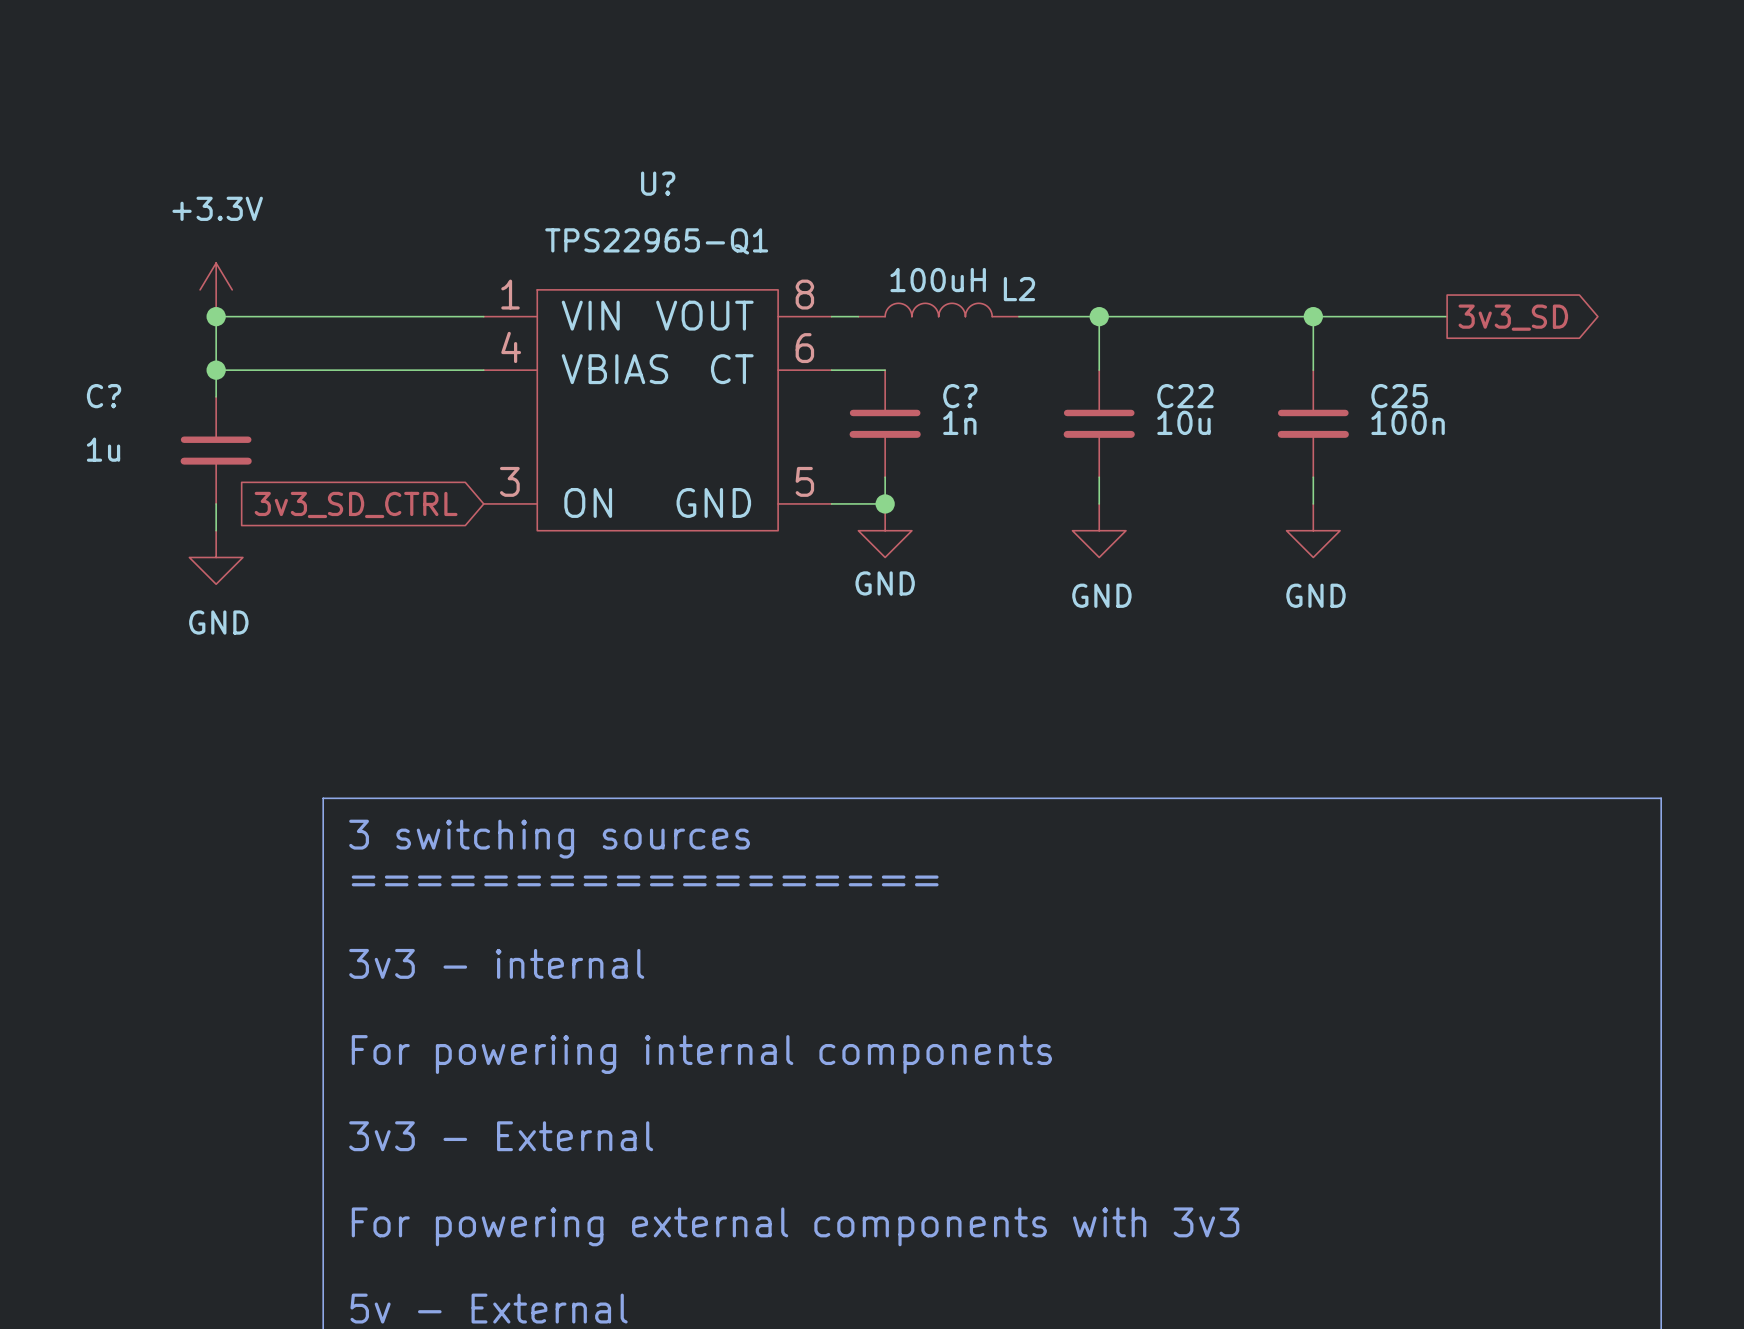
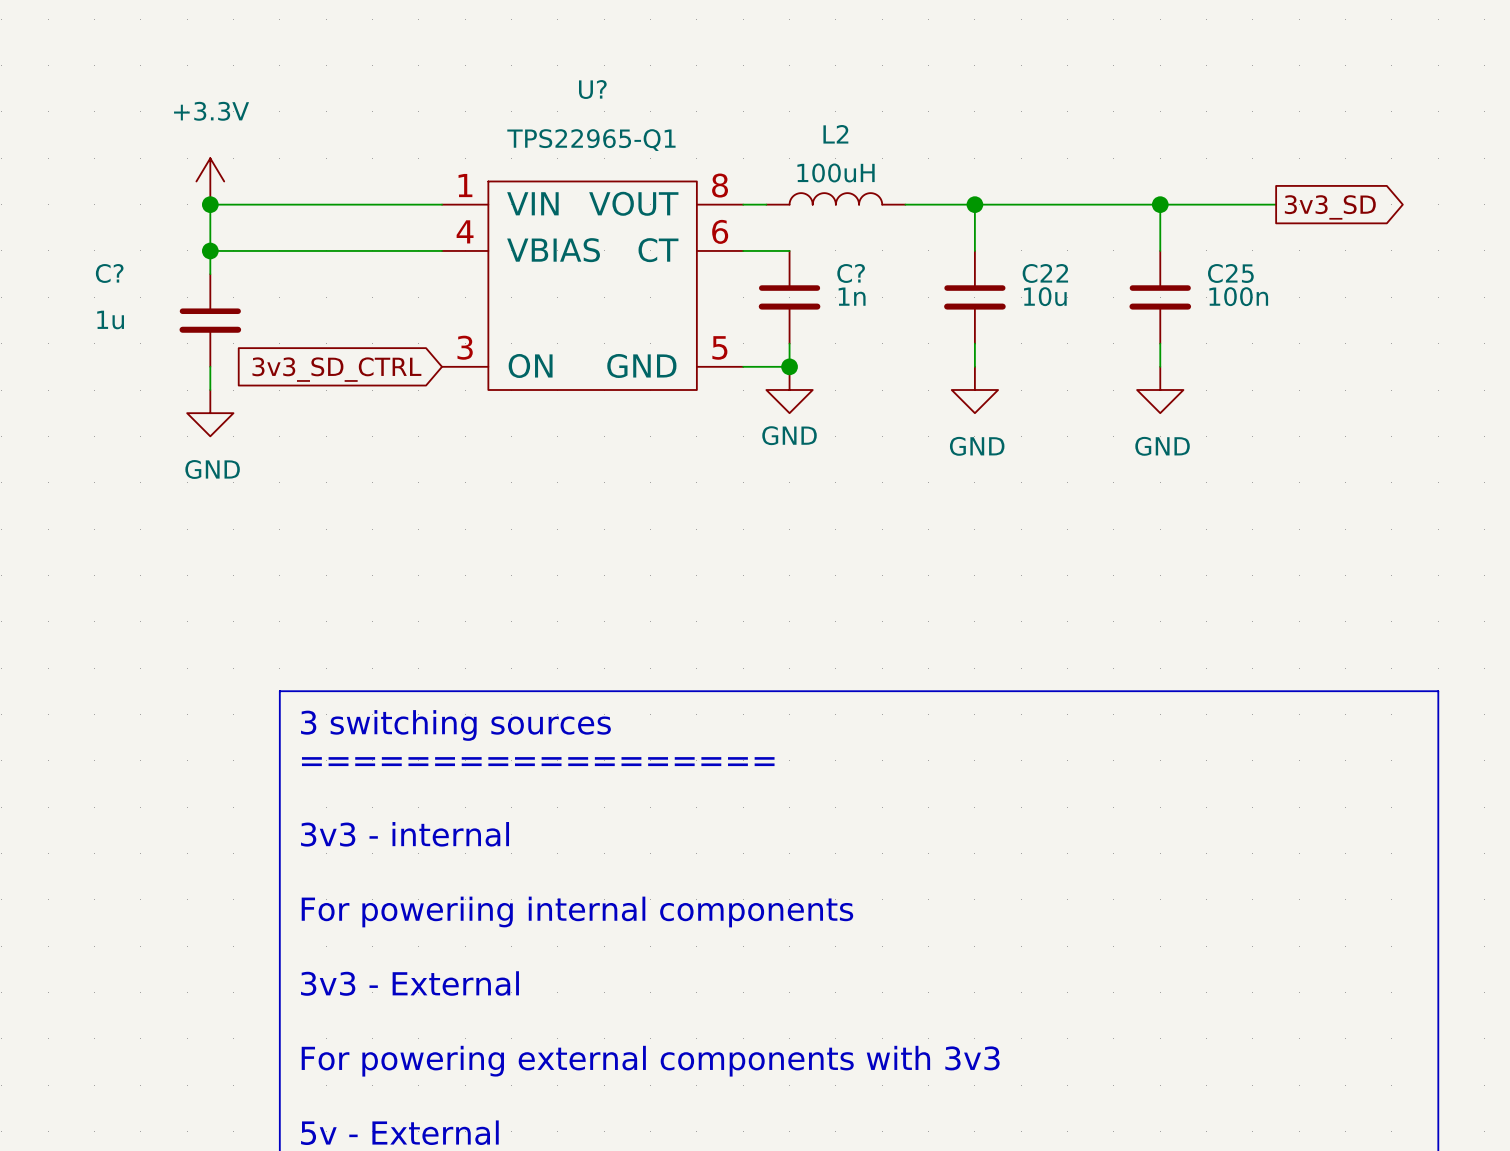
junction: none -> (210, 204)
power symbol position: +3.3V (216, 289) -> +3.3V (210, 181)
L2 name position: L2 (1019, 289) -> L2 (835, 134)
L2 position: (938, 309) -> (835, 198)
junction position: (216, 316) -> (210, 250)
wire: (483, 316) (216, 316) (216, 396) -> (442, 204) (210, 204) (210, 274)
wire: (831, 316) (858, 316) -> (743, 204) (766, 204)
wire: (1018, 316) (1447, 316) -> (905, 204) (1276, 204)
wire: (1099, 316) (1099, 370) -> (974, 204) (974, 250)
junction position: (1099, 316) -> (974, 204)
wire: (1313, 316) (1313, 370) -> (1160, 204) (1160, 250)
junction position: (1313, 316) -> (1160, 204)
global label position: 3v3_SD (1513, 317) -> 3v3_SD (1330, 207)
wire: (216, 370) (483, 370) -> (210, 250) (442, 250)
junction: (216, 370) -> none
wire: (831, 370) (885, 370) -> (743, 250) (789, 250)
U? position: (657, 410) -> (592, 285)
C? position: (885, 423) -> (789, 297)
C22 position: (1099, 423) -> (974, 297)
C25 position: (1313, 423) -> (1160, 297)
C? position: (216, 450) -> (210, 320)
wire: (885, 477) (885, 503) (831, 503) -> (789, 343) (789, 366) (743, 366)
wire: (1099, 477) (1099, 503) -> (974, 343) (974, 366)
wire: (1313, 477) (1313, 503) -> (1160, 343) (1160, 366)
wire: (216, 503) (216, 530) -> (210, 366) (210, 390)
junction position: (885, 503) -> (789, 366)
global label position: 3v3_SD_CTRL (356, 504) -> 3v3_SD_CTRL (336, 369)
power symbol position: GND (885, 530) -> GND (789, 390)
power symbol position: GND (1099, 530) -> GND (974, 390)
power symbol position: GND (1313, 530) -> GND (1160, 390)
power symbol position: GND (216, 557) -> GND (210, 413)

